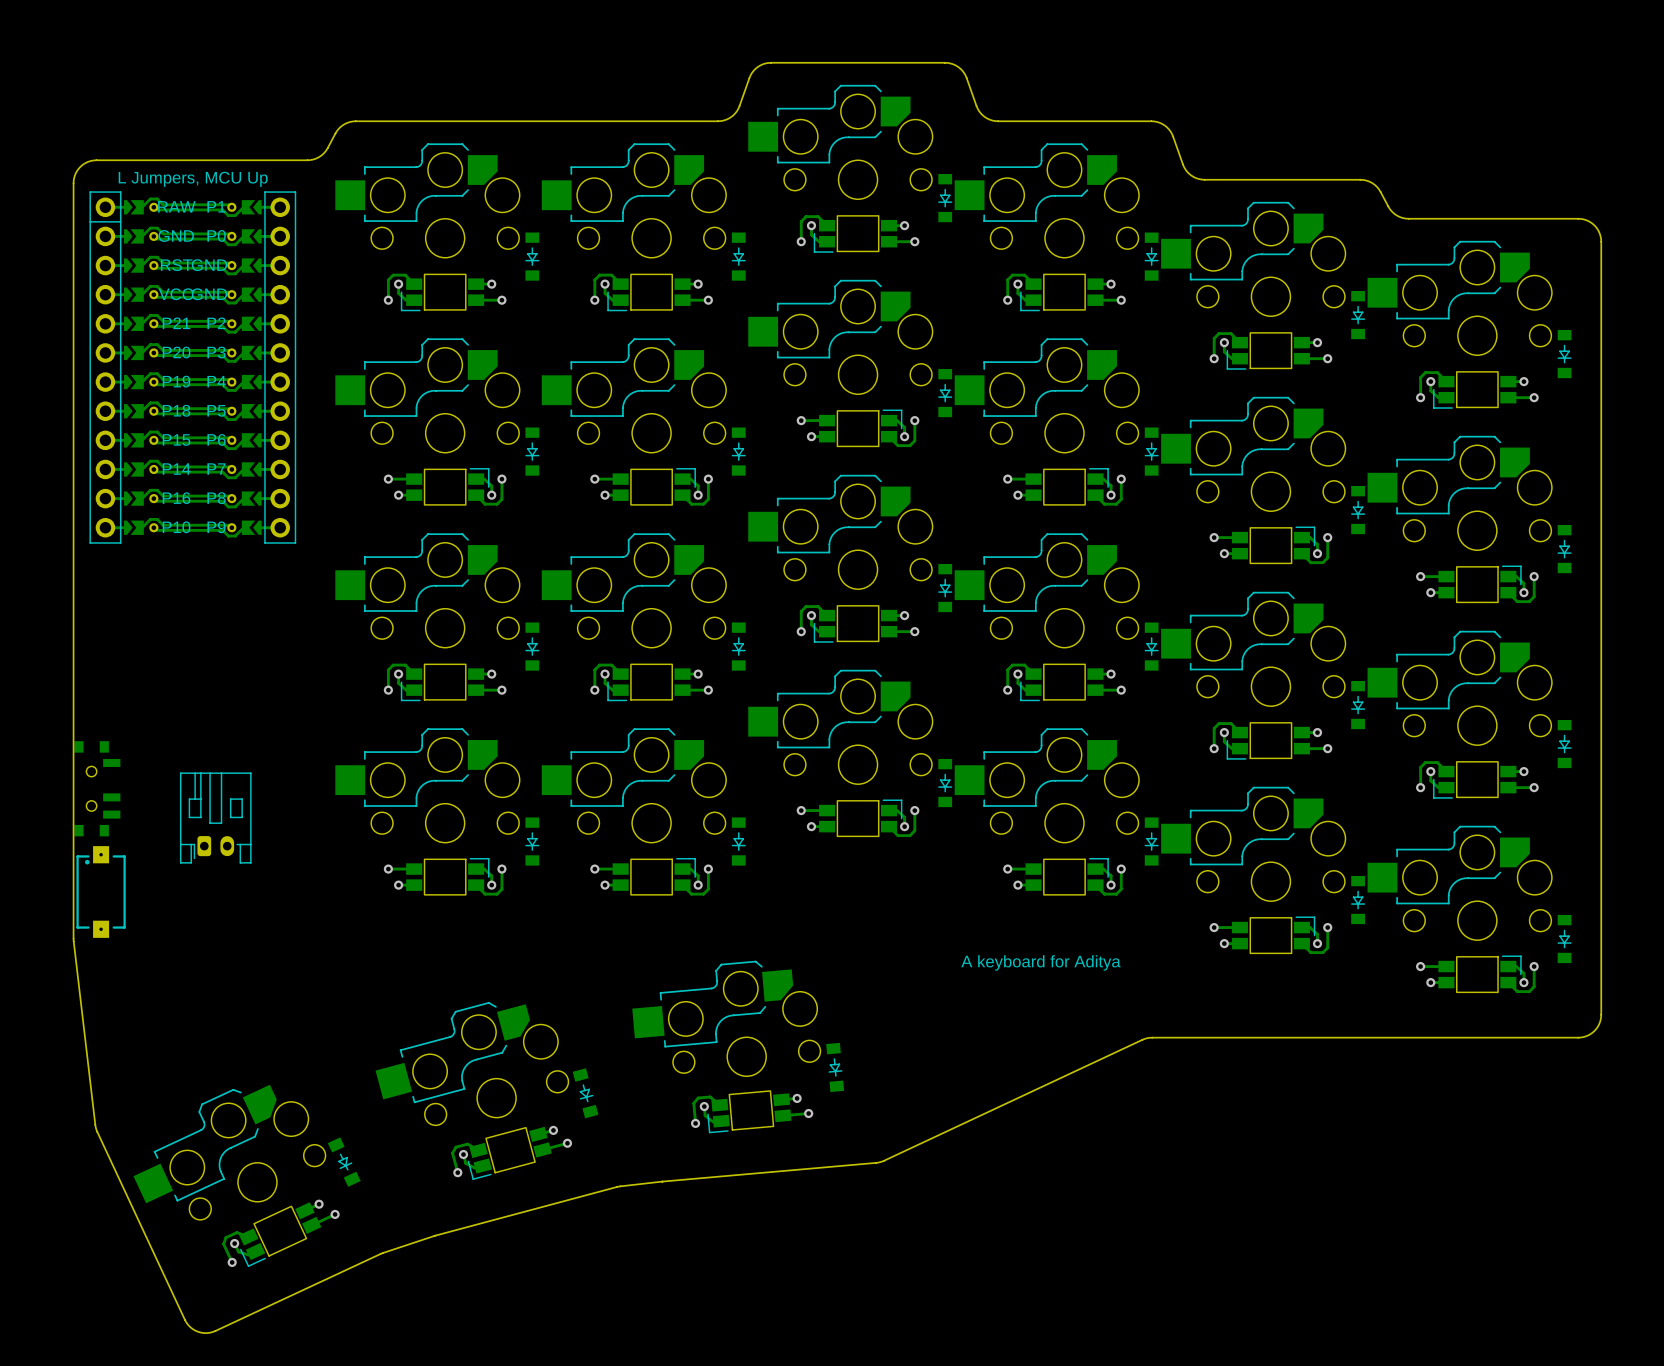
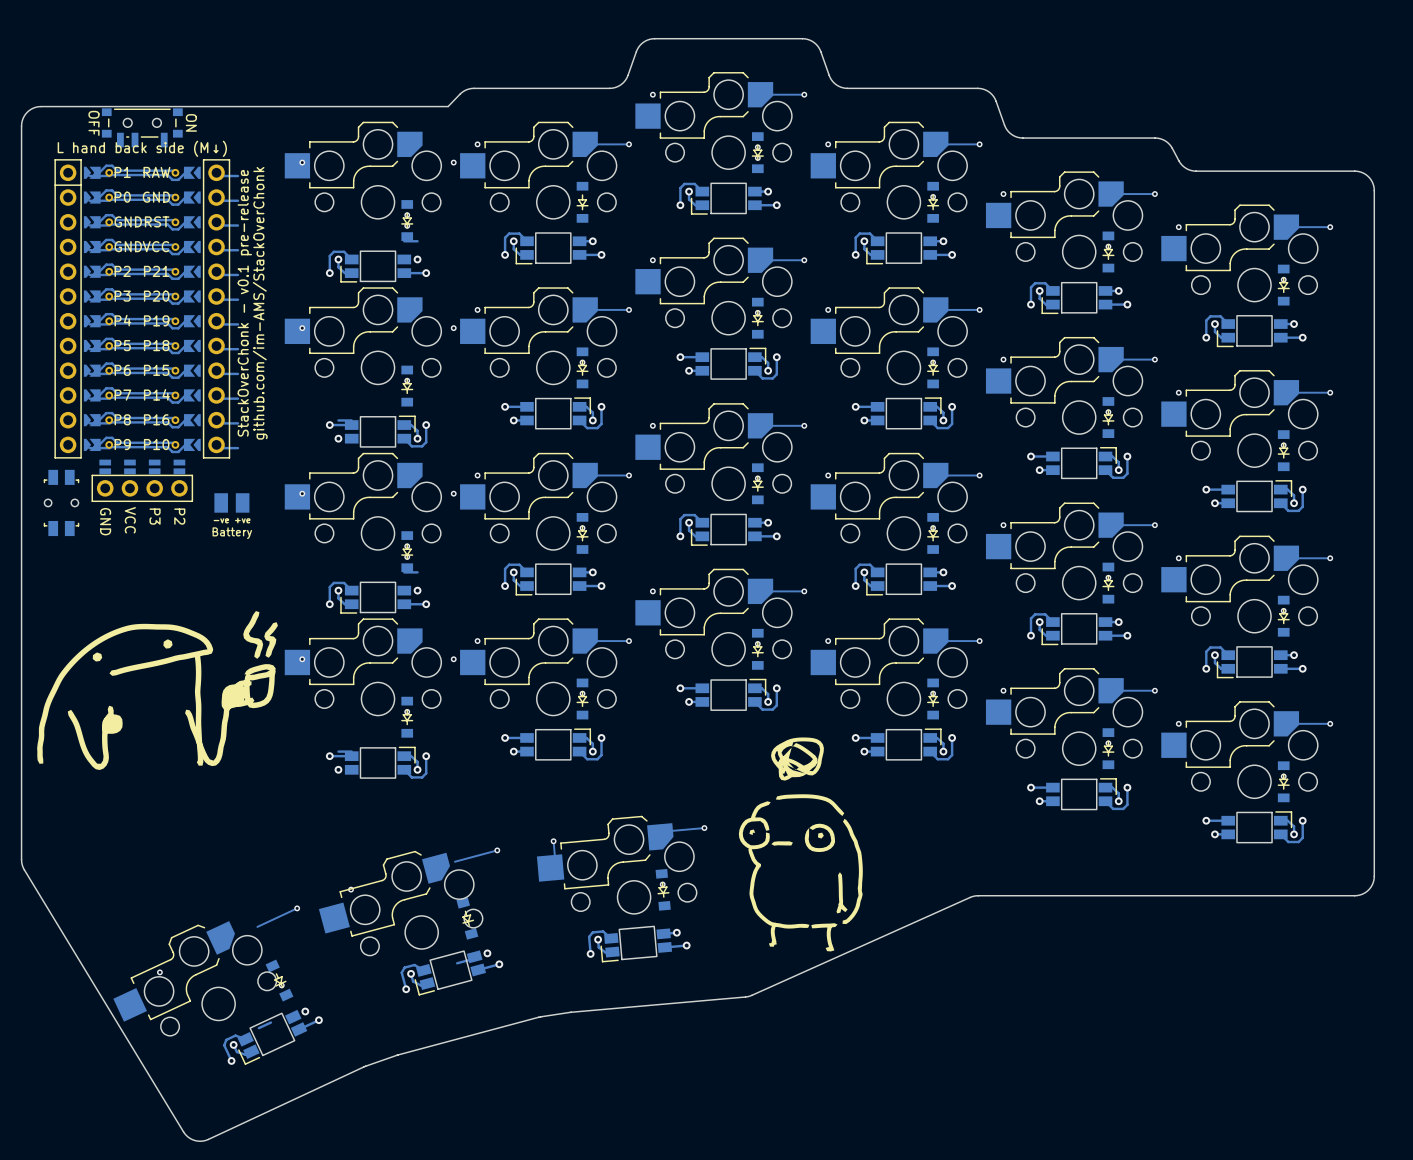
board edge: (945, 62) (765, 63) (757, 66) (751, 73) (735, 113) (728, 118) (720, 121) (353, 121) (339, 127) (324, 152) (312, 159) (96, 160) (86, 162) (77, 171) (73, 183) (73, 941) (96, 1128) (184, 1319) (195, 1330) (206, 1333) (215, 1330) (383, 1253) (435, 1235) (616, 1186) (880, 1162) (1147, 1038) (1578, 1037) (1588, 1035) (1597, 1026) (1601, 1014) (1601, 241) (1597, 229) (1590, 222) (1580, 218) (1403, 218) (1391, 210) (1376, 186) (1362, 179) (1198, 179) (1191, 175) (1185, 169) (1172, 133) (1166, 127) (1159, 122) (992, 120) (984, 117) (979, 111) (962, 70) (955, 65) (945, 62) -> (802, 38) (809, 40) (817, 45) (831, 79) (842, 87) (984, 89) (995, 99) (1006, 129) (1018, 137) (1157, 138) (1168, 143) (1181, 164) (1191, 170) (1354, 171) (1365, 174) (1371, 180) (1374, 190) (1374, 876) (1371, 886) (1363, 893) (1354, 895) (974, 896) (750, 995) (571, 1012) (538, 1017) (396, 1055) (363, 1066) (208, 1139) (199, 1141) (190, 1138) (183, 1131) (21, 863) (21, 126) (24, 115) (32, 108) (41, 106) (448, 106) (462, 91) (471, 88) (616, 87) (627, 77) (638, 47) (649, 39) (802, 38)
via: none -> (652, 94)
track: none -> (804, 94) (760, 94)
via: none -> (804, 94)
part: none -> (142, 127)
via: none -> (477, 144)
track: none -> (629, 144) (585, 144)
via: none -> (629, 144)
via: none -> (828, 144)
track: none -> (979, 144) (935, 144)
via: none -> (979, 144)
via: none -> (757, 147)
via: none -> (757, 158)
via: none -> (302, 162)
via: none -> (453, 162)
part position: (945, 198) -> (757, 152)
track: (229, 204) (163, 204) (157, 198) (150, 198) (142, 207) (138, 207) -> (173, 170) (117, 170) (112, 165) (106, 165) (99, 172) (95, 172)
track: (247, 207) (243, 207) (235, 215) (228, 215) (222, 209) (156, 209) -> (188, 172) (185, 172) (178, 179) (172, 179) (167, 175) (111, 175)
via: none -> (1003, 194)
track: none -> (1154, 194) (1111, 194)
via: none -> (1154, 194)
via: none -> (933, 196)
track: (229, 233) (163, 233) (157, 228) (150, 228) (142, 236) (138, 236) -> (173, 195) (117, 195) (112, 190) (106, 190) (99, 197) (95, 197)
track: (247, 236) (243, 236) (235, 244) (228, 244) (222, 239) (156, 239) -> (188, 197) (185, 197) (178, 204) (172, 204) (167, 199) (111, 199)
via: none -> (407, 215)
part position: (532, 256) -> (407, 220)
part position: (738, 256) -> (582, 202)
part position: (1151, 256) -> (933, 202)
track: (229, 263) (163, 263) (157, 257) (150, 257) (142, 265) (138, 265) -> (173, 220) (117, 220) (112, 215) (106, 215) (99, 222) (95, 222)
track: (247, 265) (243, 265) (235, 273) (228, 273) (222, 268) (156, 268) -> (188, 222) (185, 222) (178, 229) (172, 229) (167, 224) (111, 224)
via: none -> (407, 225)
via: none -> (1178, 227)
track: none -> (1330, 227) (1286, 227)
via: none -> (1330, 227)
track: (398, 284) (398, 293) (406, 300) (414, 300) -> (338, 259) (338, 267) (344, 273) (351, 273)
via: (398, 284) -> none
track: (414, 284) (405, 275) (393, 275) (388, 280) (388, 300) -> (351, 259) (344, 251) (333, 251) (329, 255) (329, 273)
via: (491, 284) -> none
via: none -> (1108, 246)
track: (229, 292) (163, 292) (157, 286) (150, 286) (142, 294) (138, 294) -> (173, 244) (117, 244) (112, 239) (106, 239) (99, 247) (95, 247)
part position: (442, 292) -> (375, 266)
track: (247, 294) (243, 294) (235, 303) (228, 303) (222, 297) (156, 297) -> (188, 247) (185, 247) (178, 254) (172, 254) (167, 249) (111, 249)
via: (388, 300) -> none
track: (501, 300) (476, 300) -> (426, 273) (404, 273)
via: (501, 300) -> none
via: none -> (338, 259)
via: none -> (417, 259)
via: none -> (652, 260)
track: none -> (804, 260) (760, 260)
via: none -> (804, 260)
part position: (1358, 315) -> (1108, 251)
track: (229, 321) (163, 321) (157, 315) (150, 315) (142, 323) (138, 323) -> (173, 269) (117, 269) (112, 264) (106, 264) (99, 271) (95, 271)
via: none -> (329, 273)
via: none -> (426, 273)
track: (247, 323) (243, 323) (235, 332) (228, 332) (222, 326) (156, 326) -> (188, 271) (185, 271) (178, 278) (172, 278) (167, 273) (111, 273)
via: none -> (1283, 279)
track: (229, 350) (163, 350) (157, 344) (150, 344) (142, 352) (138, 352) -> (173, 294) (117, 294) (112, 289) (106, 289) (99, 296) (95, 296)
track: (247, 352) (243, 352) (235, 361) (228, 361) (222, 355) (156, 355) -> (188, 296) (185, 296) (178, 303) (172, 303) (167, 298) (111, 298)
part position: (1564, 354) -> (1283, 285)
text: none -> github.com/im-AMS/StackOverChonk (260, 303)
text: none -> StackOverChonk - v0.1 pre-release (244, 303)
part: none -> (142, 308)
via: none -> (477, 309)
track: none -> (629, 309) (585, 309)
via: none -> (629, 309)
via: none -> (828, 309)
track: none -> (979, 309) (935, 309)
via: none -> (979, 309)
part: (192, 367) -> none
via: none -> (757, 312)
track: (229, 379) (163, 379) (157, 373) (150, 373) (142, 382) (138, 382) -> (173, 319) (117, 319) (112, 314) (106, 314) (99, 321) (95, 321)
track: (247, 382) (243, 382) (235, 390) (228, 390) (222, 384) (156, 384) -> (188, 321) (185, 321) (178, 328) (172, 328) (167, 323) (111, 323)
via: none -> (302, 328)
via: none -> (453, 328)
part position: (945, 393) -> (757, 318)
track: (229, 408) (163, 408) (157, 402) (150, 402) (142, 411) (138, 411) -> (173, 343) (117, 343) (112, 338) (106, 338) (99, 345) (95, 345)
track: (247, 411) (243, 411) (235, 419) (228, 419) (222, 413) (156, 413) -> (188, 345) (185, 345) (178, 353) (172, 353) (167, 348) (111, 348)
via: none -> (1003, 359)
track: none -> (1154, 359) (1111, 359)
via: none -> (1154, 359)
via: none -> (582, 362)
via: none -> (933, 362)
track: (229, 437) (163, 437) (157, 432) (150, 432) (142, 440) (138, 440) -> (173, 368) (117, 368) (112, 363) (106, 363) (99, 370) (95, 370)
track: (247, 440) (243, 440) (235, 448) (228, 448) (222, 442) (156, 442) -> (188, 370) (185, 370) (178, 377) (172, 377) (167, 372) (111, 372)
via: none -> (407, 380)
part position: (532, 451) -> (407, 386)
part position: (738, 451) -> (582, 367)
part position: (1151, 451) -> (933, 367)
via: none -> (1178, 392)
track: none -> (1330, 392) (1286, 392)
via: none -> (1330, 392)
track: (229, 466) (163, 466) (157, 461) (150, 461) (142, 469) (138, 469) -> (173, 393) (117, 393) (112, 388) (106, 388) (99, 395) (95, 395)
track: (247, 469) (243, 469) (235, 477) (228, 477) (222, 472) (156, 472) -> (188, 395) (185, 395) (178, 402) (172, 402) (167, 397) (111, 397)
via: (388, 479) -> none
track: (414, 479) (388, 479) -> (351, 425) (329, 425)
track: (476, 479) (484, 479) (491, 485) (491, 495) -> (404, 425) (411, 425) (417, 430) (417, 438)
track: (501, 479) (501, 499) (497, 504) (485, 504) (476, 495) -> (426, 425) (426, 442) (422, 446) (411, 446) (404, 438)
via: (501, 479) -> none
via: none -> (1108, 412)
part position: (447, 486) -> (380, 431)
via: (398, 495) -> none
via: (491, 495) -> none
track: (229, 496) (163, 496) (157, 490) (150, 490) (142, 498) (138, 498) -> (173, 418) (117, 418) (112, 413) (106, 413) (99, 420) (95, 420)
track: (247, 498) (243, 498) (235, 506) (228, 506) (222, 501) (156, 501) -> (188, 420) (185, 420) (178, 427) (172, 427) (167, 422) (111, 422)
via: none -> (329, 425)
via: none -> (426, 425)
via: none -> (652, 425)
track: none -> (804, 425) (760, 425)
via: none -> (804, 425)
part position: (1358, 510) -> (1108, 417)
via: none -> (338, 438)
via: none -> (417, 438)
via: none -> (1283, 445)
track: (229, 525) (163, 525) (157, 519) (150, 519) (142, 527) (138, 527) -> (173, 442) (117, 442) (112, 437) (106, 437) (99, 444) (95, 444)
track: (247, 527) (243, 527) (235, 536) (228, 536) (222, 530) (156, 530) -> (188, 444) (185, 444) (178, 451) (172, 451) (167, 447) (111, 447)
part position: (1564, 549) -> (1283, 450)
via: none -> (477, 475)
track: none -> (629, 475) (585, 475)
via: none -> (629, 475)
via: none -> (828, 475)
track: none -> (979, 475) (935, 475)
via: none -> (979, 475)
via: none -> (757, 478)
part: none -> (142, 480)
via: none -> (302, 493)
via: none -> (453, 493)
part position: (945, 588) -> (757, 483)
part: none -> (61, 502)
part: none -> (231, 502)
via: none -> (1003, 525)
track: none -> (1154, 525) (1111, 525)
via: none -> (1154, 525)
via: none -> (582, 528)
via: none -> (933, 528)
via: none -> (407, 546)
part position: (532, 646) -> (407, 551)
part position: (738, 646) -> (582, 533)
part position: (1151, 646) -> (933, 533)
via: none -> (407, 557)
via: none -> (1178, 558)
track: none -> (1330, 558) (1286, 558)
via: none -> (1330, 558)
track: (398, 674) (398, 683) (406, 690) (414, 690) -> (338, 590) (338, 598) (344, 604) (351, 604)
via: (398, 674) -> none
track: (414, 674) (405, 665) (393, 665) (388, 669) (388, 690) -> (351, 590) (344, 582) (333, 582) (329, 587) (329, 604)
via: (491, 674) -> none
via: none -> (1108, 577)
part position: (442, 682) -> (375, 597)
via: (388, 690) -> none
track: (501, 690) (476, 690) -> (426, 604) (404, 604)
via: (501, 690) -> none
via: none -> (338, 590)
via: none -> (417, 590)
via: none -> (652, 591)
track: none -> (804, 591) (760, 591)
via: none -> (804, 591)
part position: (1358, 705) -> (1108, 583)
via: none -> (329, 604)
via: none -> (426, 604)
drawing: none -> [37, 611, 278, 771]
via: none -> (1283, 610)
part position: (1564, 744) -> (1283, 616)
via: none -> (477, 641)
track: none -> (629, 641) (585, 641)
via: none -> (629, 641)
via: none -> (828, 641)
track: none -> (979, 641) (935, 641)
via: none -> (979, 641)
via: none -> (757, 643)
via: none -> (302, 659)
via: none -> (453, 659)
part position: (945, 783) -> (757, 649)
part: (97, 788) -> none
via: none -> (1003, 690)
track: none -> (1154, 690) (1111, 690)
via: none -> (1154, 690)
via: none -> (582, 693)
via: none -> (933, 693)
part: (215, 818) -> none
via: none -> (407, 711)
part position: (532, 841) -> (407, 717)
part position: (738, 841) -> (582, 699)
part position: (1151, 841) -> (933, 699)
via: none -> (1178, 723)
track: none -> (1330, 723) (1286, 723)
via: none -> (1330, 723)
drawing: none -> [771, 737, 824, 781]
via: (388, 869) -> none
track: (414, 869) (388, 869) -> (351, 756) (329, 756)
track: (476, 869) (484, 869) (491, 875) (491, 885) -> (404, 756) (411, 756) (417, 761) (417, 769)
track: (501, 869) (501, 889) (497, 894) (485, 894) (476, 885) -> (426, 756) (426, 773) (422, 777) (411, 777) (404, 769)
via: (501, 869) -> none
via: none -> (1108, 743)
part position: (447, 876) -> (380, 762)
via: (398, 885) -> none
via: (491, 885) -> none
via: none -> (329, 756)
via: none -> (426, 756)
part: (101, 892) -> none
part position: (1358, 900) -> (1108, 748)
via: none -> (338, 769)
via: none -> (417, 769)
via: none -> (1283, 776)
drawing: none -> [738, 794, 863, 952]
part position: (1564, 939) -> (1283, 781)
text: A keyboard for Aditya (1040, 962) -> none
track: none -> (704, 828) (660, 831)
via: none -> (704, 828)
track: none -> (553, 841) (555, 862)
via: none -> (553, 841)
track: none -> (497, 850) (454, 861)
via: none -> (497, 850)
via: none -> (662, 884)
via: none -> (351, 889)
part position: (835, 1067) -> (663, 889)
track: none -> (297, 908) (257, 926)
via: none -> (297, 908)
part position: (585, 1093) -> (467, 918)
via: none -> (487, 953)
via: (553, 1130) -> none
via: none -> (499, 964)
track: (567, 1143) (542, 1149) -> (499, 964) (478, 969)
via: (567, 1143) -> none
via: none -> (159, 972)
via: none -> (411, 973)
track: (478, 1150) (467, 1144) (455, 1147) (452, 1153) (457, 1172) -> (423, 970) (414, 964) (404, 967) (401, 972) (406, 989)
part position: (509, 1153) -> (450, 972)
track: (463, 1154) (465, 1163) (474, 1168) (482, 1165) -> (411, 973) (413, 981) (420, 985) (427, 983)
via: (463, 1154) -> none
via: none -> (281, 985)
part position: (344, 1162) -> (279, 980)
via: none -> (406, 989)
via: (457, 1172) -> none
via: none -> (305, 1011)
via: none -> (318, 1020)
via: (319, 1204) -> none
track: (335, 1214) (311, 1225) -> (318, 1020) (299, 1029)
via: (335, 1214) -> none
via: none -> (233, 1044)
part position: (280, 1234) -> (272, 1037)
track: (248, 1236) (236, 1232) (225, 1237) (223, 1244) (232, 1262) -> (245, 1039) (235, 1035) (226, 1039) (224, 1045) (231, 1060)
track: (234, 1243) (238, 1251) (248, 1254) (255, 1251) -> (233, 1044) (236, 1052) (245, 1054) (251, 1051)
via: (234, 1243) -> none
via: none -> (231, 1060)
via: (232, 1262) -> none

